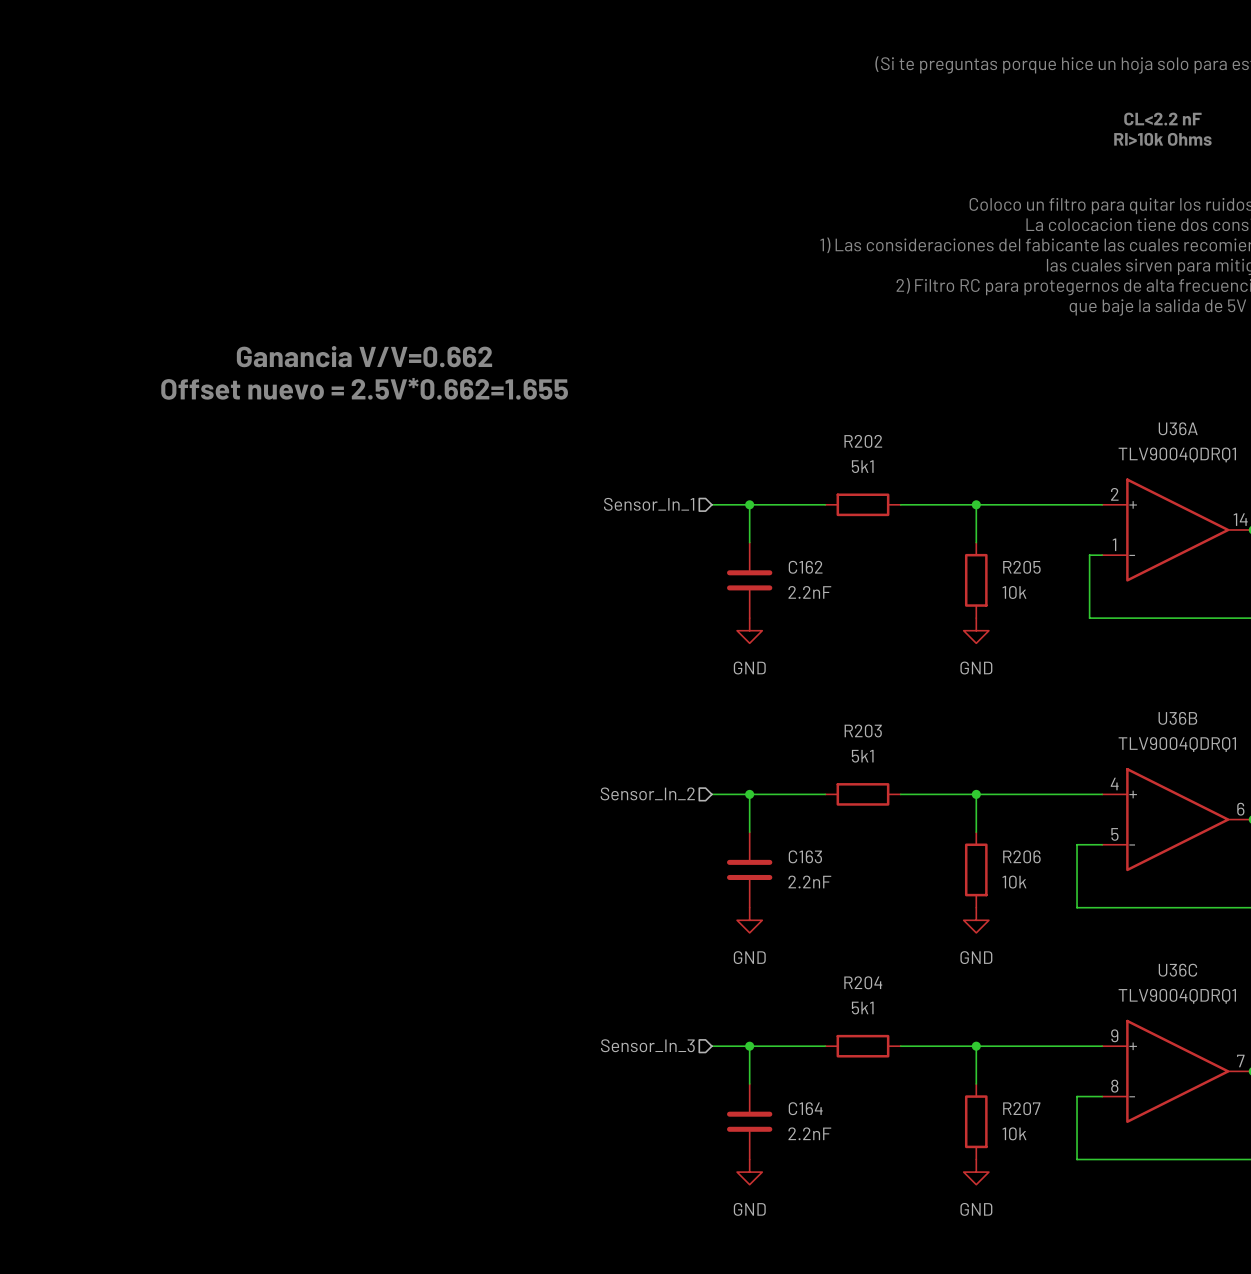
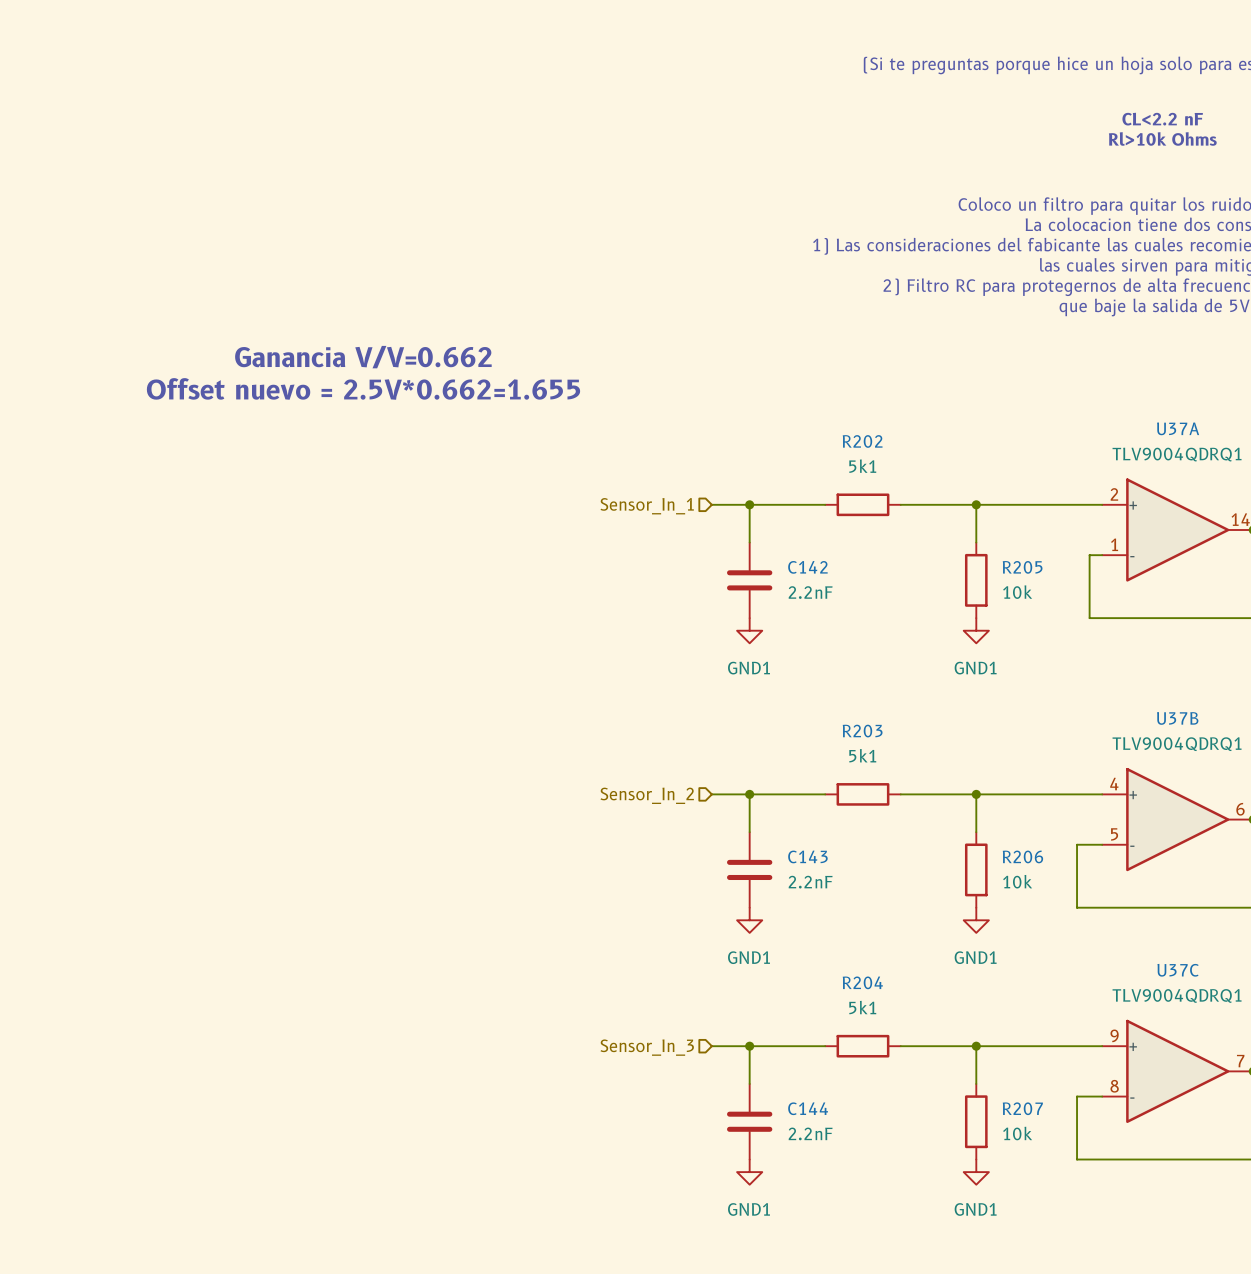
U36A name: U36A (1178, 428) -> U37A (1178, 428)
C162 name: C162 (805, 567) -> C142 (807, 567)
power symbol: GND (749, 630) -> GND1 (749, 630)
power symbol: GND (976, 630) -> GND1 (976, 630)
U36B name: U36B (1177, 718) -> U37B (1177, 718)
C163 name: C163 (805, 856) -> C143 (807, 856)
power symbol: GND (749, 920) -> GND1 (749, 920)
power symbol: GND (976, 920) -> GND1 (976, 920)
U36C name: U36C (1177, 970) -> U37C (1178, 970)
C164 name: C164 (805, 1108) -> C144 (808, 1108)
power symbol: GND (749, 1172) -> GND1 (749, 1172)
power symbol: GND (976, 1172) -> GND1 (976, 1172)

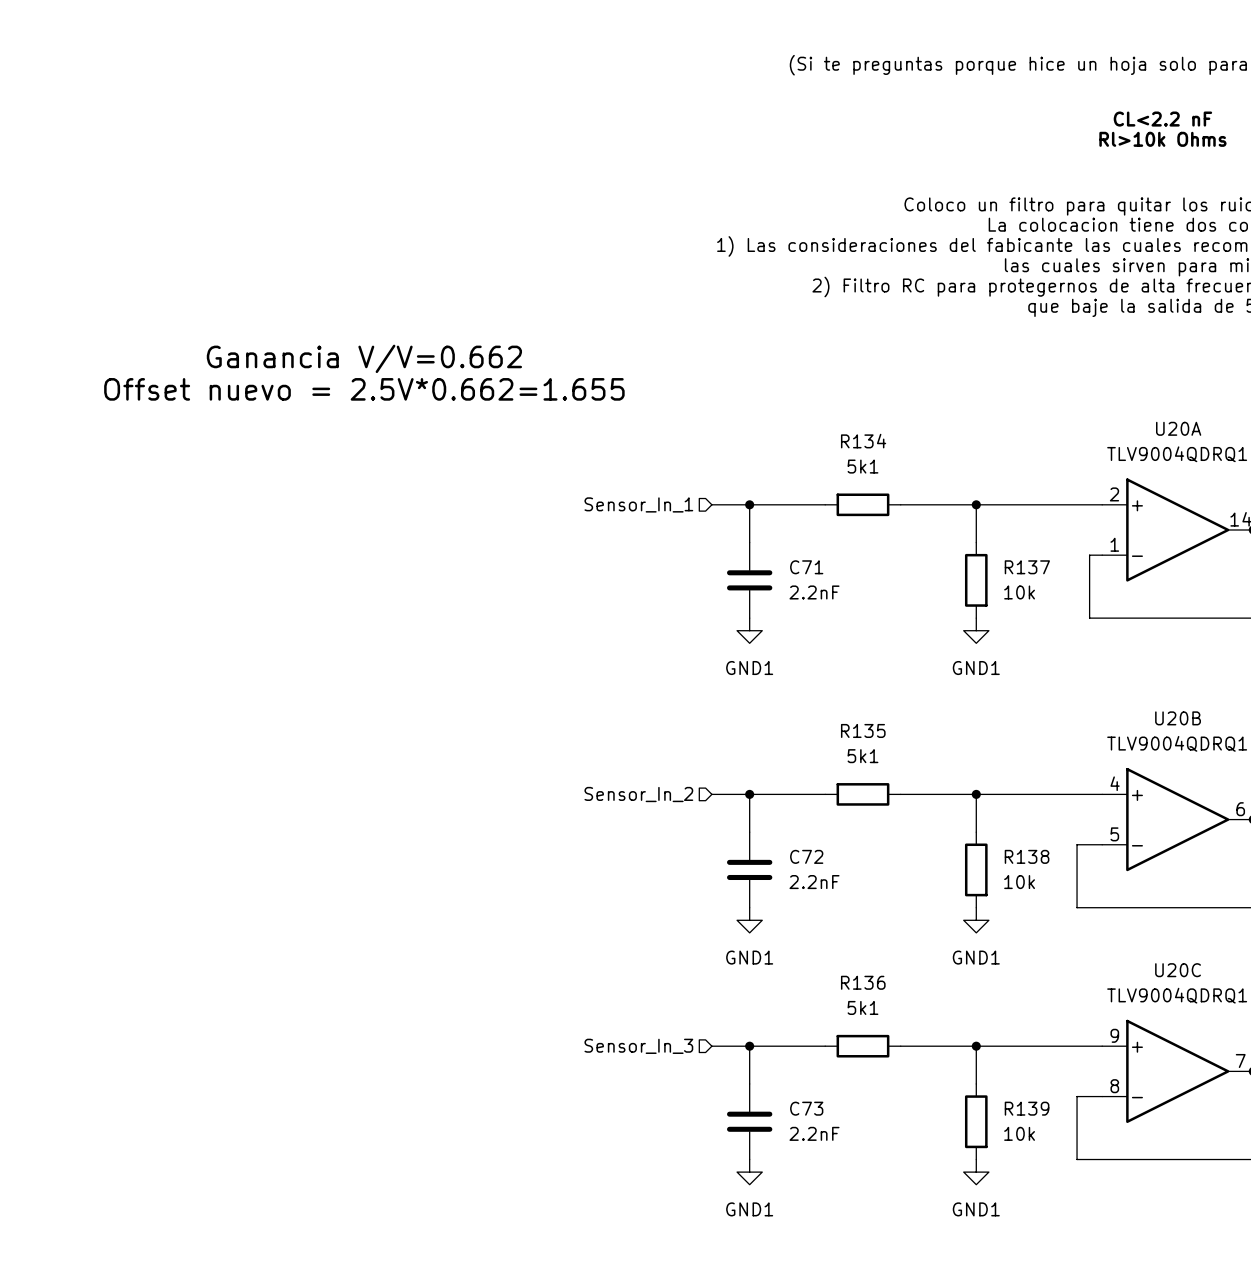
U37A name: U37A (1178, 428) -> U20A (1178, 428)
R202 name: R202 (862, 441) -> R134 (863, 441)
C142 name: C142 (807, 567) -> C71 (806, 567)
R205 name: R205 (1022, 567) -> R137 (1027, 567)
U37B name: U37B (1177, 718) -> U20B (1178, 718)
R203 name: R203 (862, 731) -> R135 (863, 730)
C143 name: C143 (807, 856) -> C72 (806, 856)
R206 name: R206 (1022, 856) -> R138 (1027, 856)
U37C name: U37C (1178, 970) -> U20C (1178, 970)
R204 name: R204 (862, 982) -> R136 (863, 982)
C144 name: C144 (808, 1108) -> C73 (806, 1108)
R207 name: R207 (1022, 1108) -> R139 (1027, 1108)

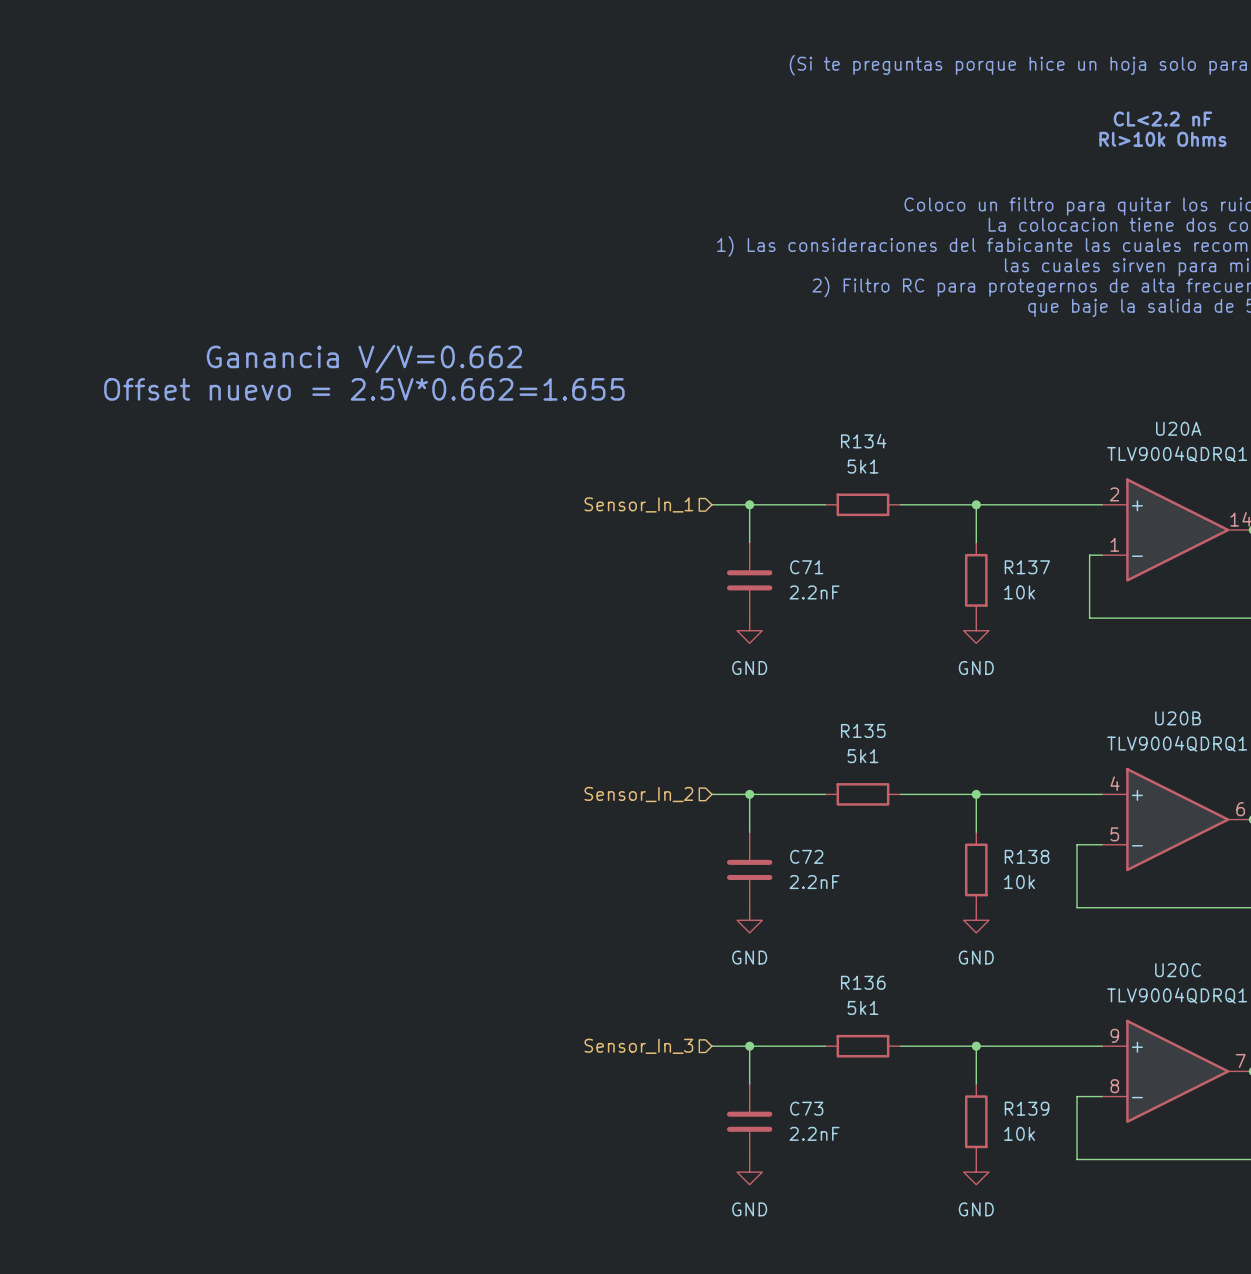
power symbol: GND1 (749, 630) -> GND (749, 630)
power symbol: GND1 (976, 630) -> GND (976, 630)
power symbol: GND1 (749, 920) -> GND (749, 920)
power symbol: GND1 (976, 920) -> GND (976, 920)
power symbol: GND1 (749, 1172) -> GND (749, 1172)
power symbol: GND1 (976, 1172) -> GND (976, 1172)

